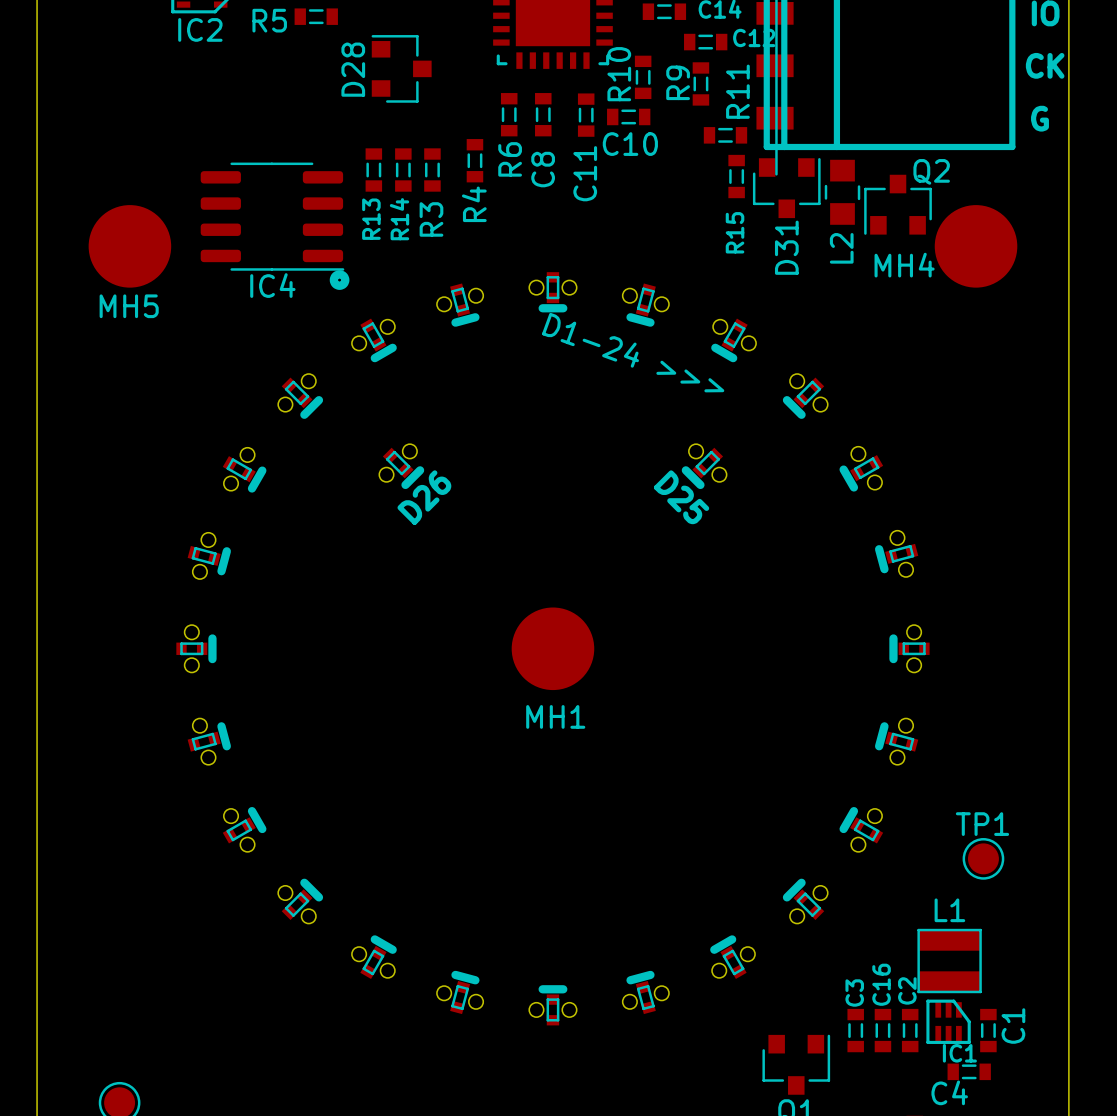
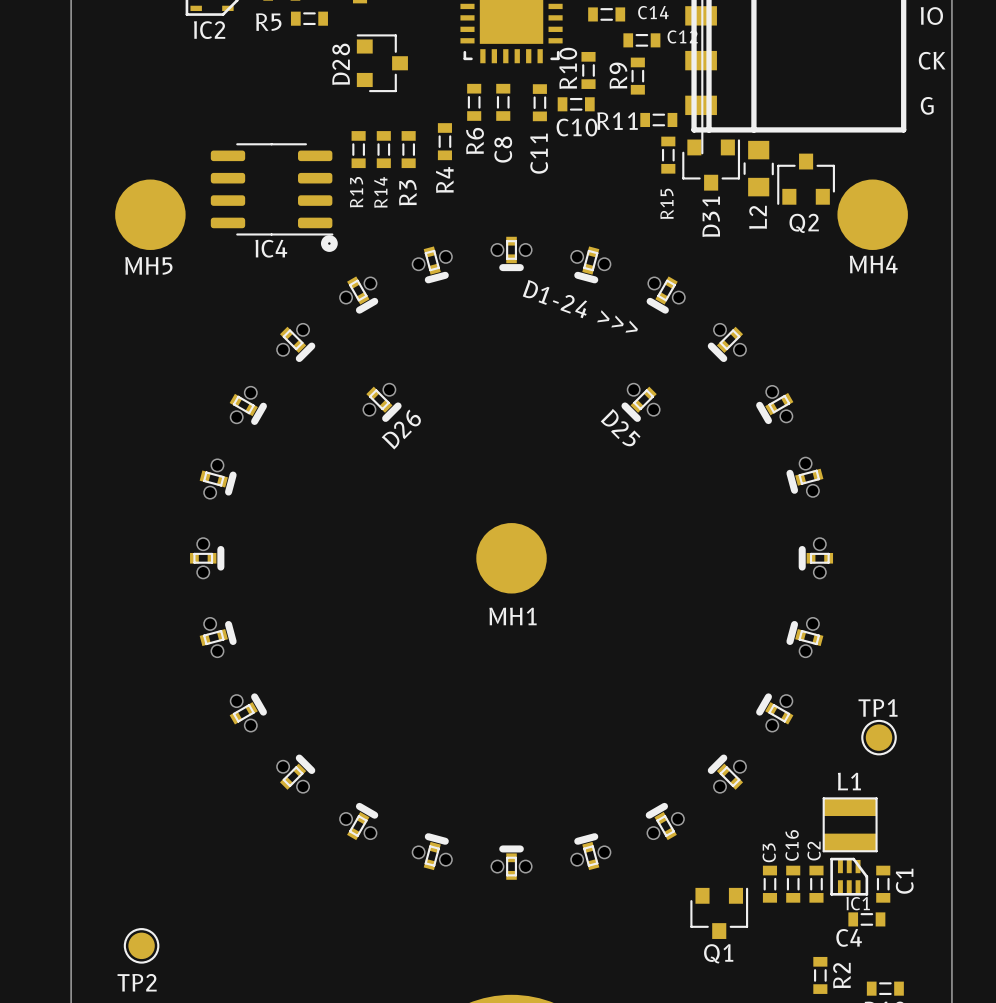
R11 name rotation: 0° (737, 91) -> 90° clockwise (617, 121)
R11 name position: R11 (737, 91) -> R11 (617, 121)
Q2 name position: Q2 (931, 171) -> Q2 (804, 223)
MH4 name position: MH4 (904, 265) -> MH4 (873, 264)

